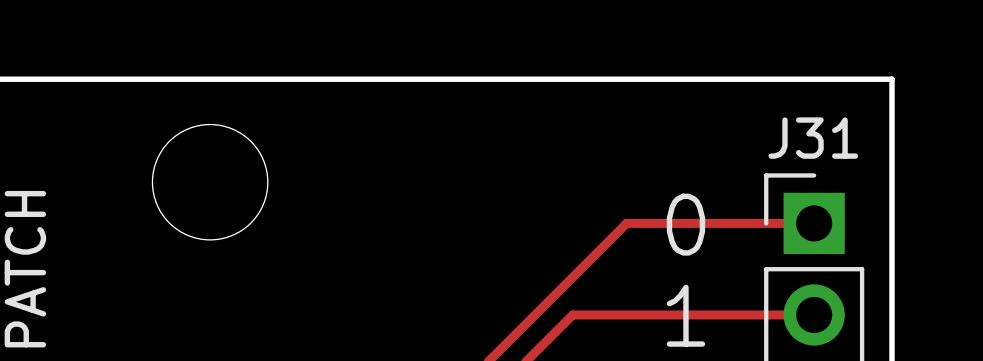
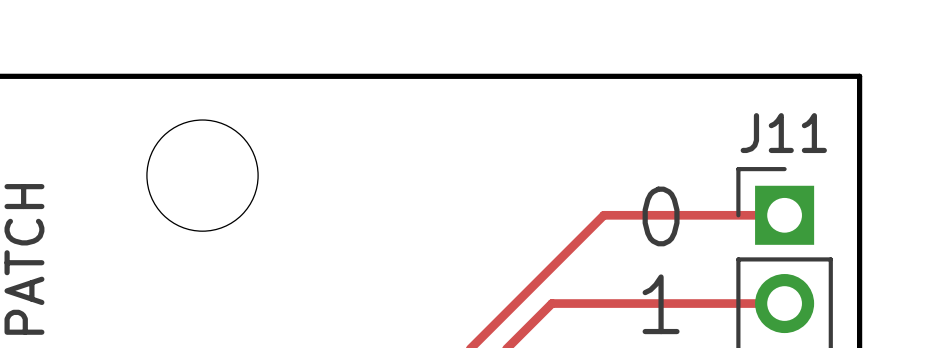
J31 name: J31 (813, 138) -> J11 (783, 133)

